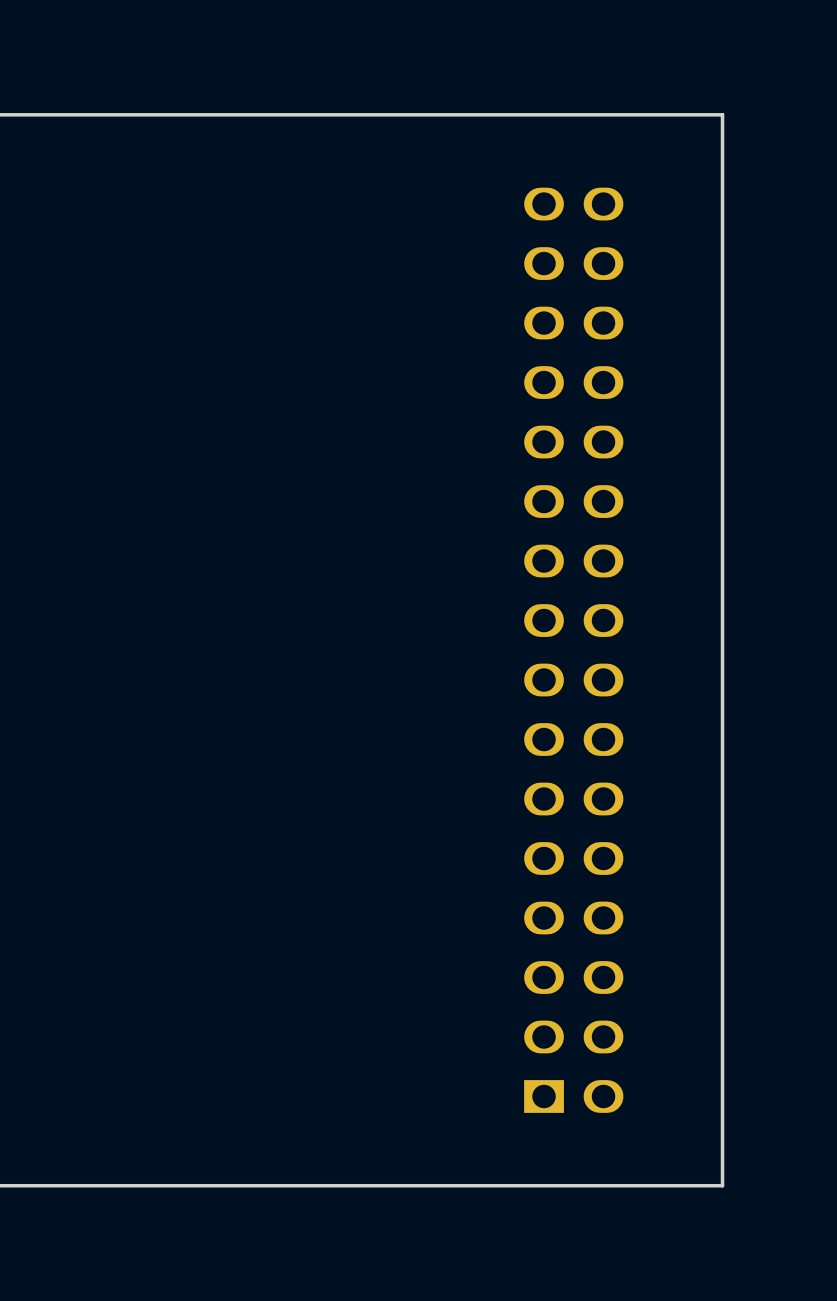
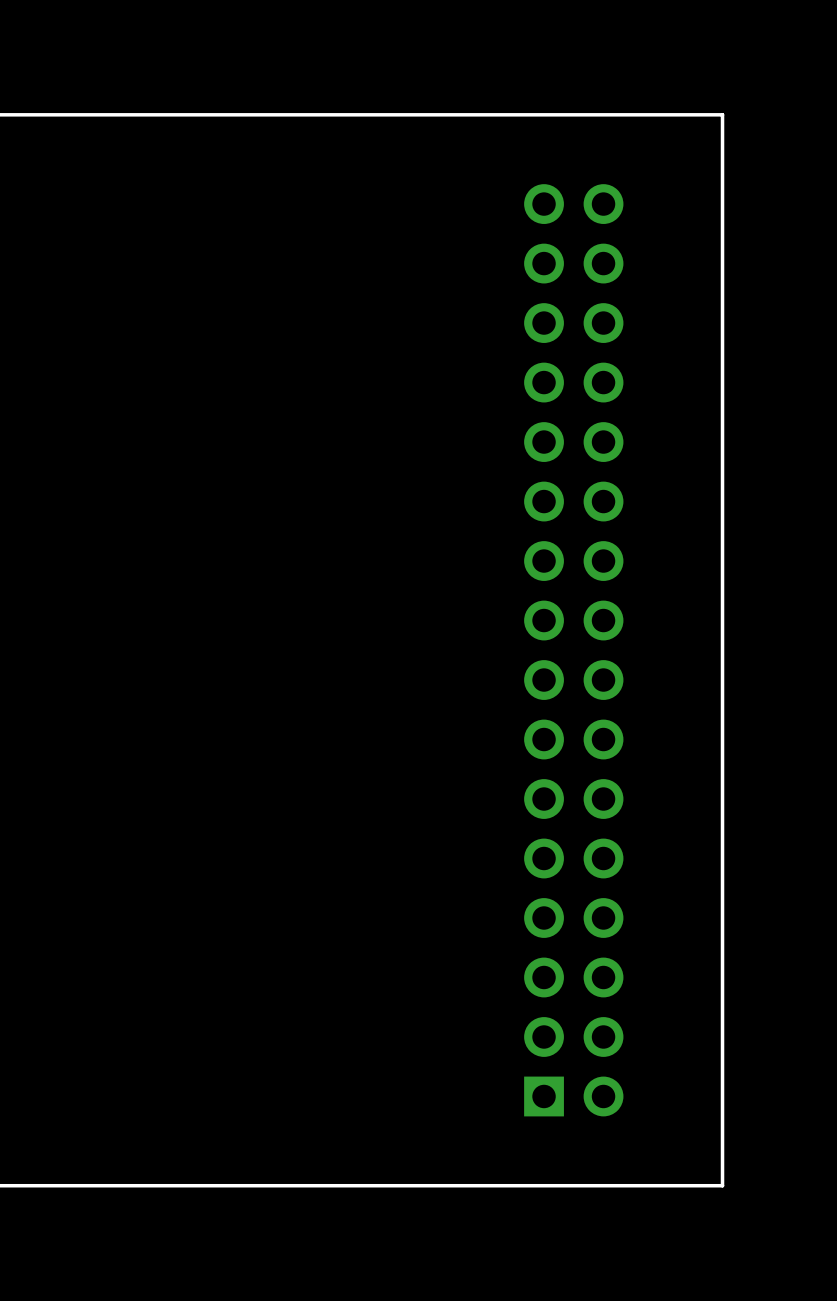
part footprint: [524, 187, 624, 1113] -> [524, 184, 624, 1117]

